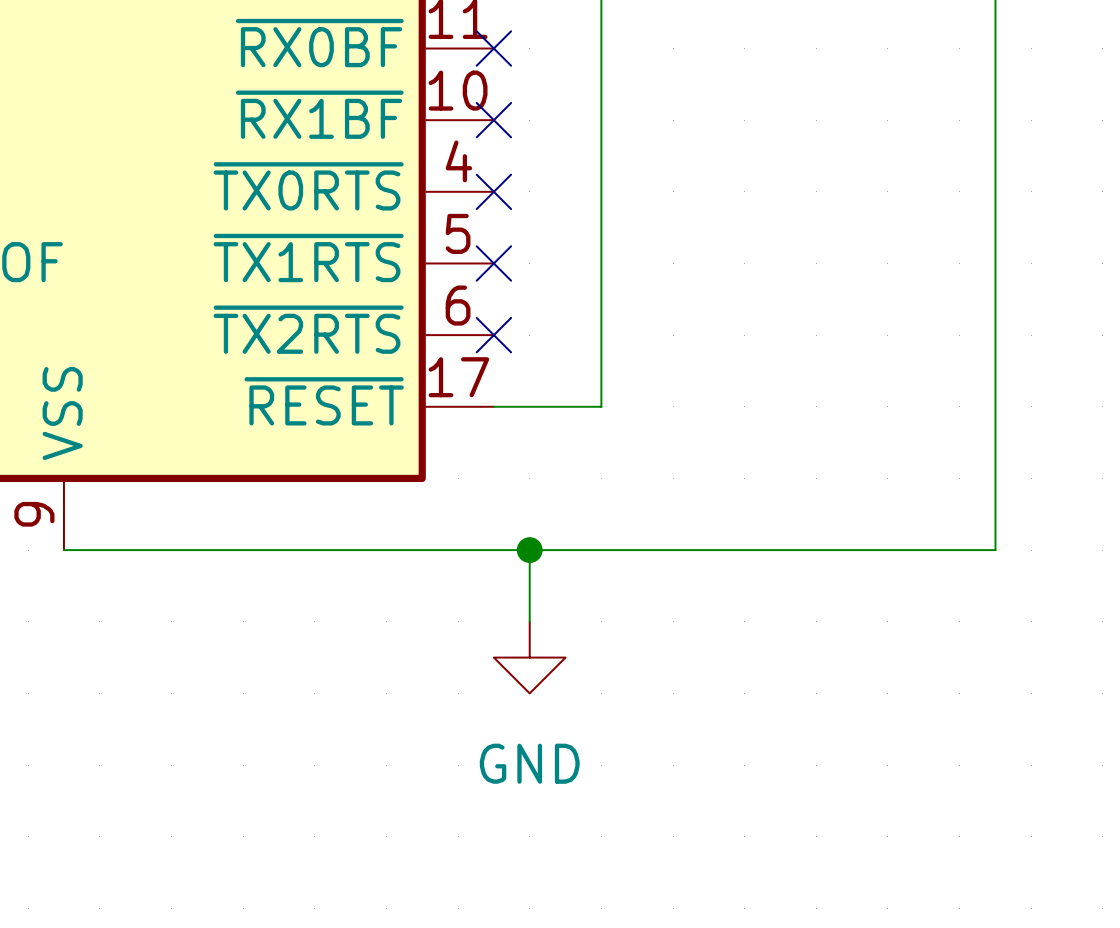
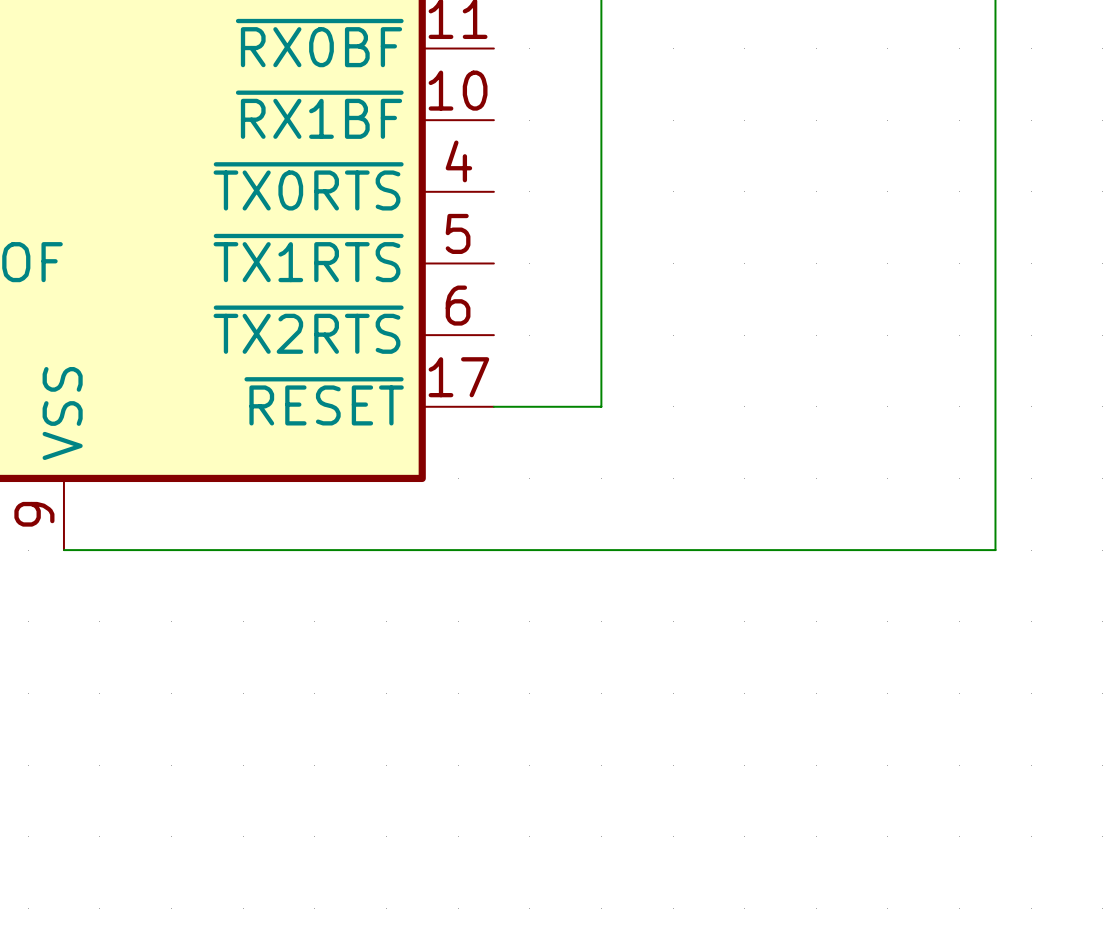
no-connect mark: (493, 48) -> none
no-connect mark: (493, 120) -> none
no-connect mark: (493, 191) -> none
no-connect mark: (493, 263) -> none
no-connect mark: (493, 335) -> none
wire: (529, 550) (529, 621) -> none
junction: (529, 550) -> none
power symbol: GND (529, 657) -> none

